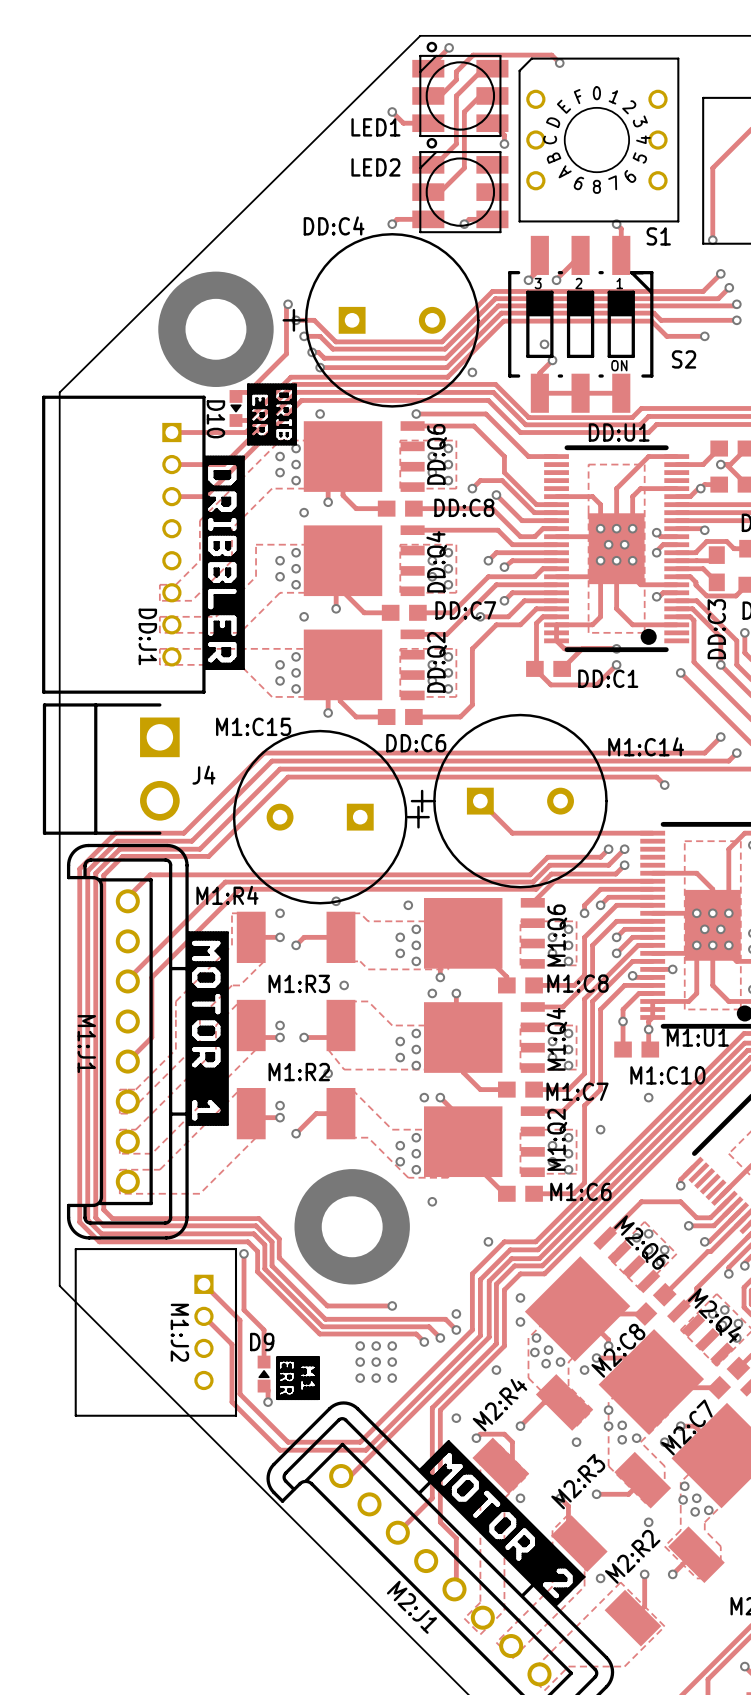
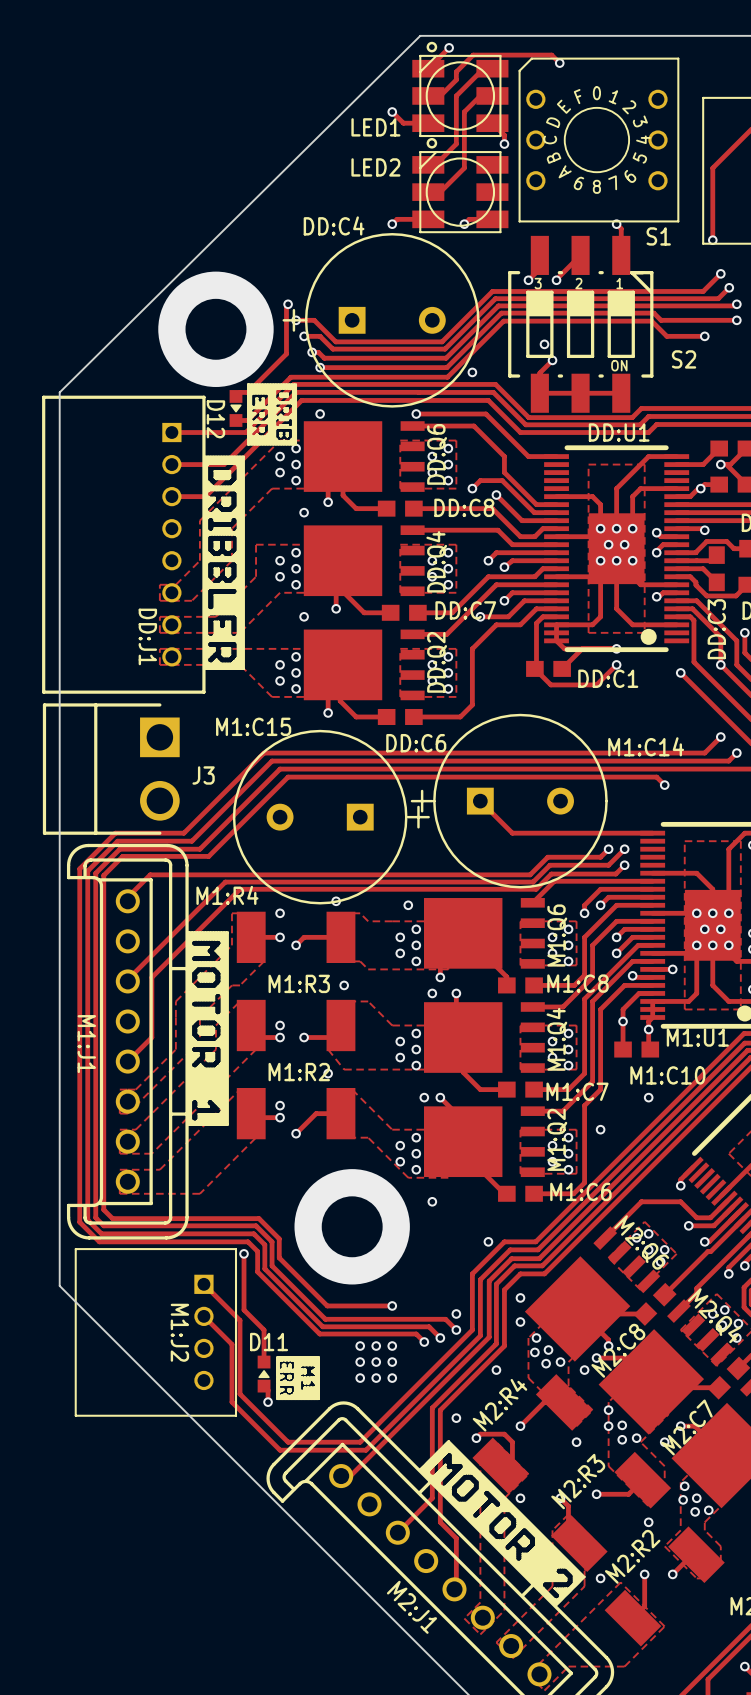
D10 name: D10 (215, 419) -> D12 (215, 419)
J4 name: J4 (203, 775) -> J3 (203, 775)
D9 name: D9 (262, 1342) -> D11 (269, 1342)

